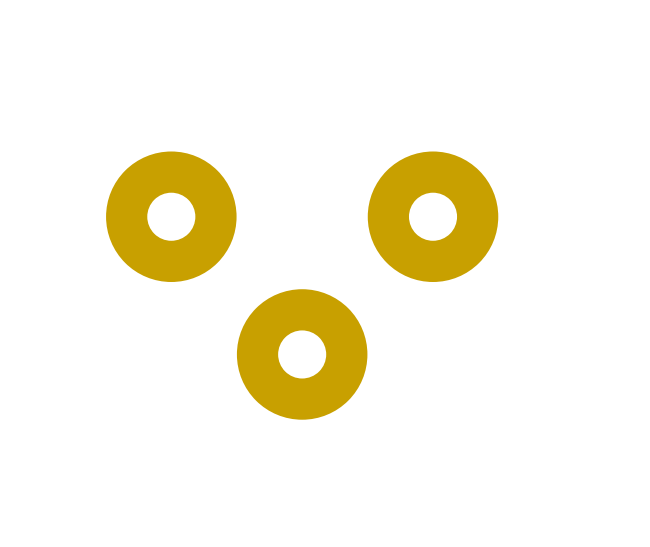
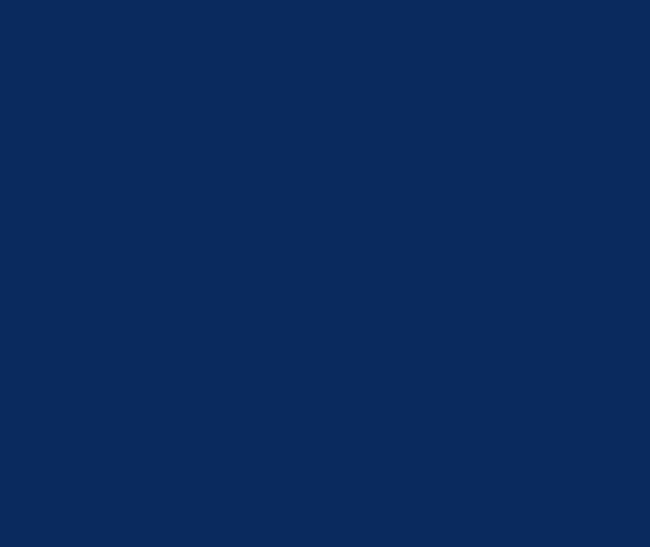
part: (302, 285) -> none

